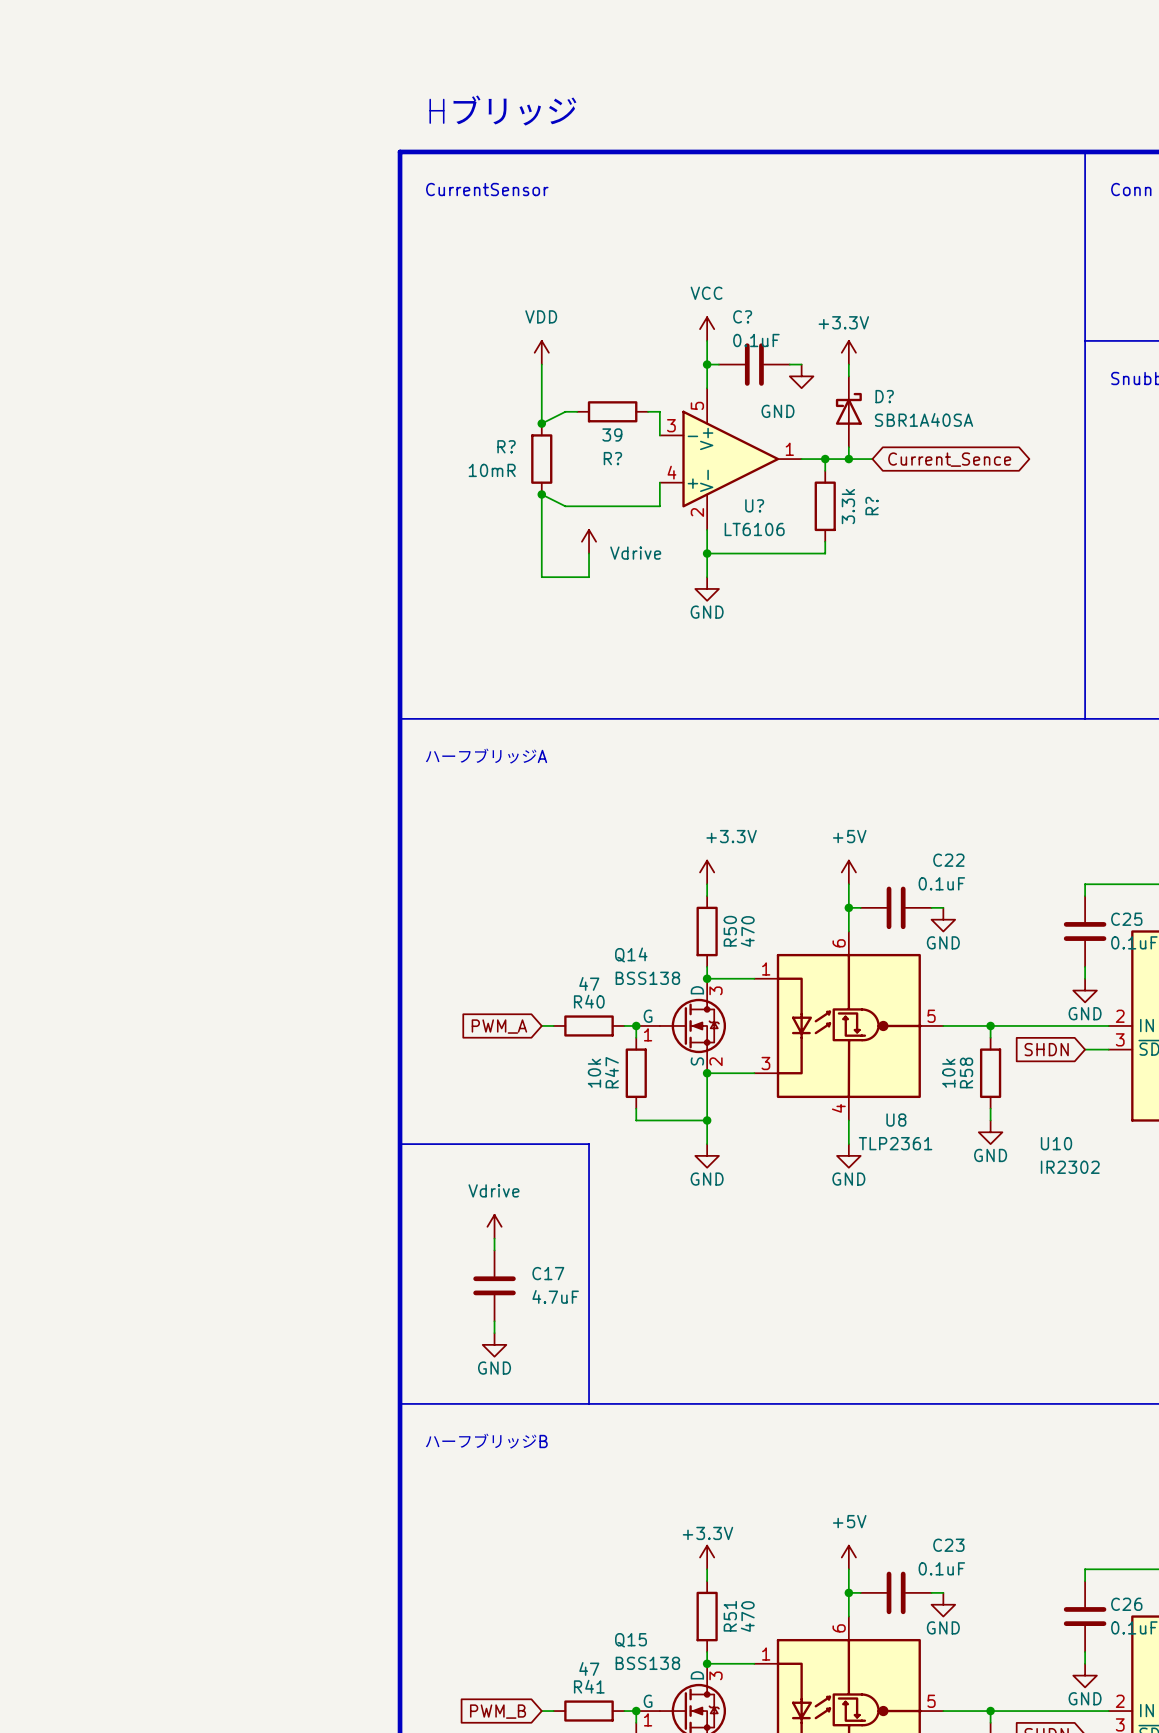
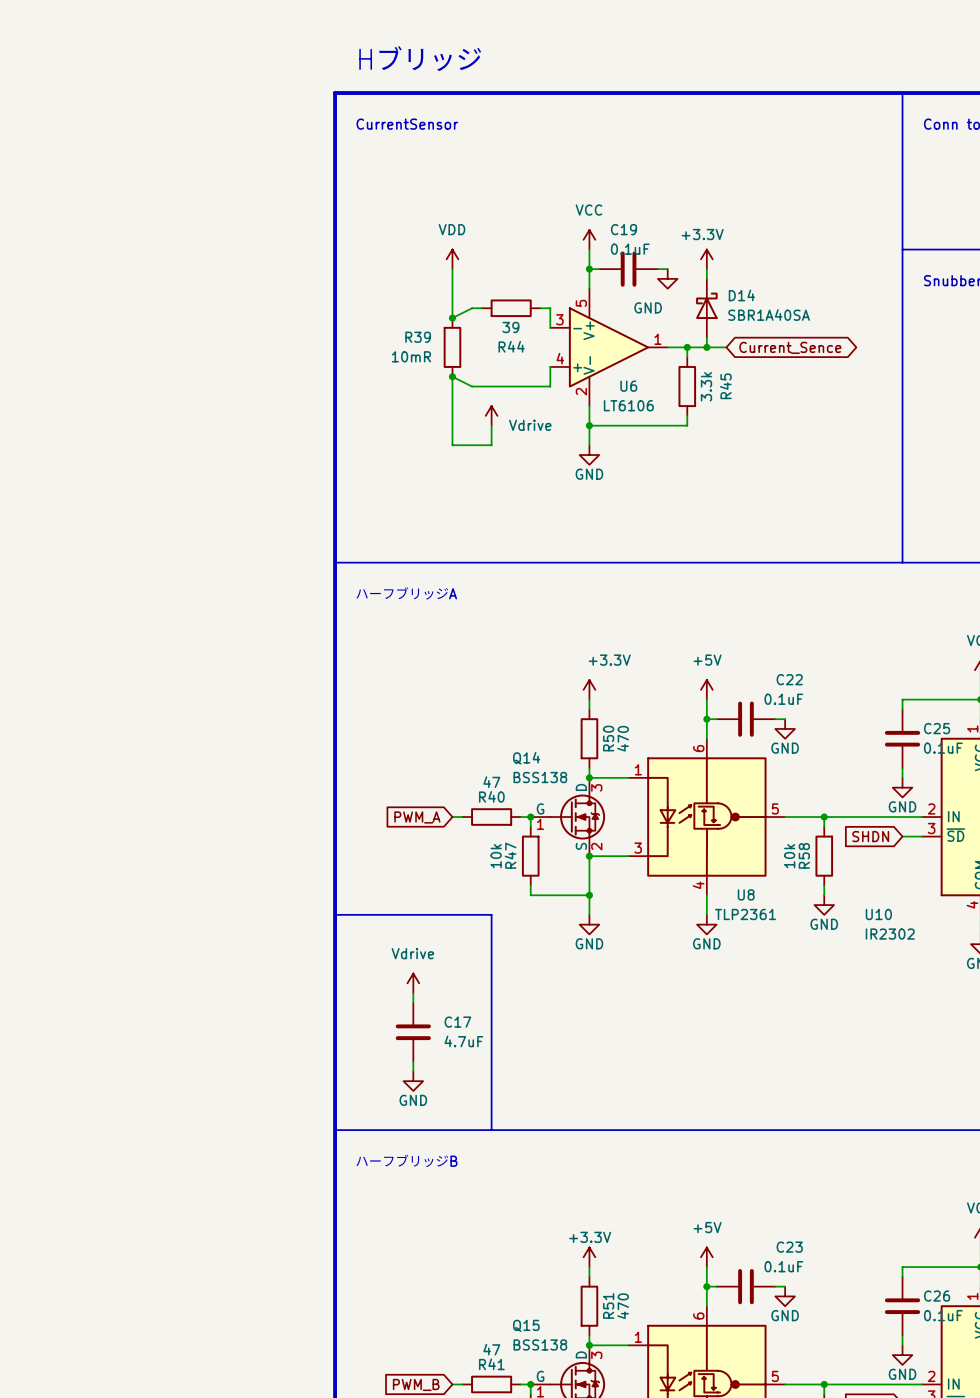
C? name: C? (742, 316) -> C19 (623, 229)
D? name: D? (884, 396) -> D14 (741, 295)
R? name: R? (506, 446) -> R39 (418, 337)
R? name: R? (612, 458) -> R44 (511, 346)
U? name: U? (754, 505) -> U6 (628, 386)
R? name: R? (872, 506) -> R45 (725, 386)

